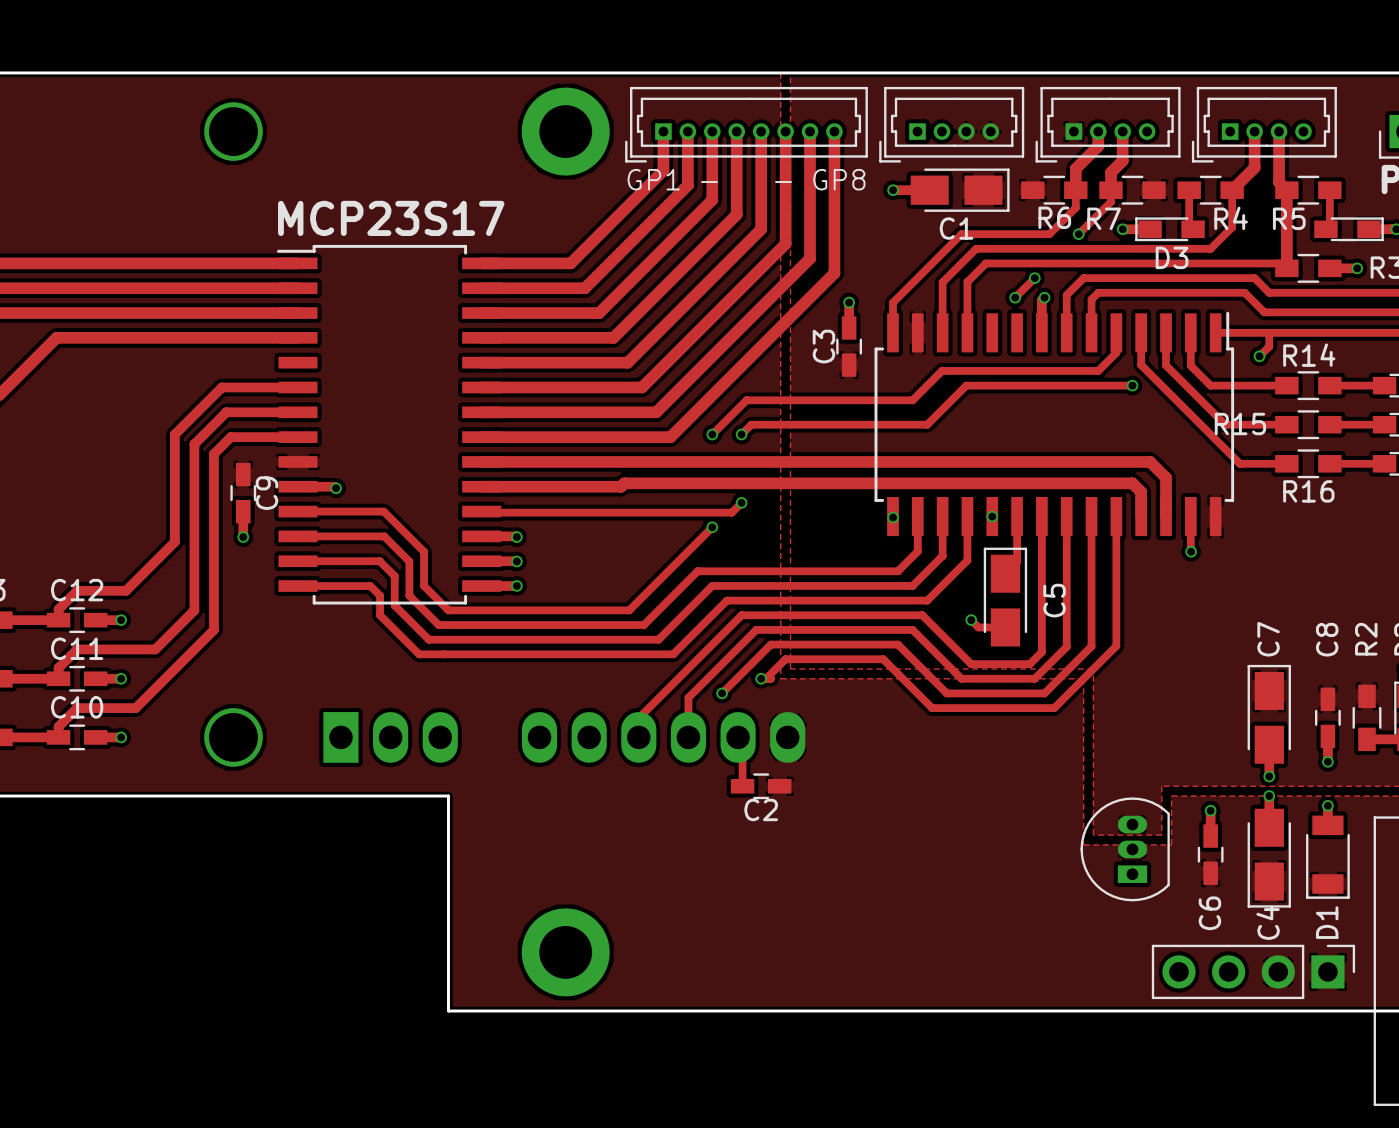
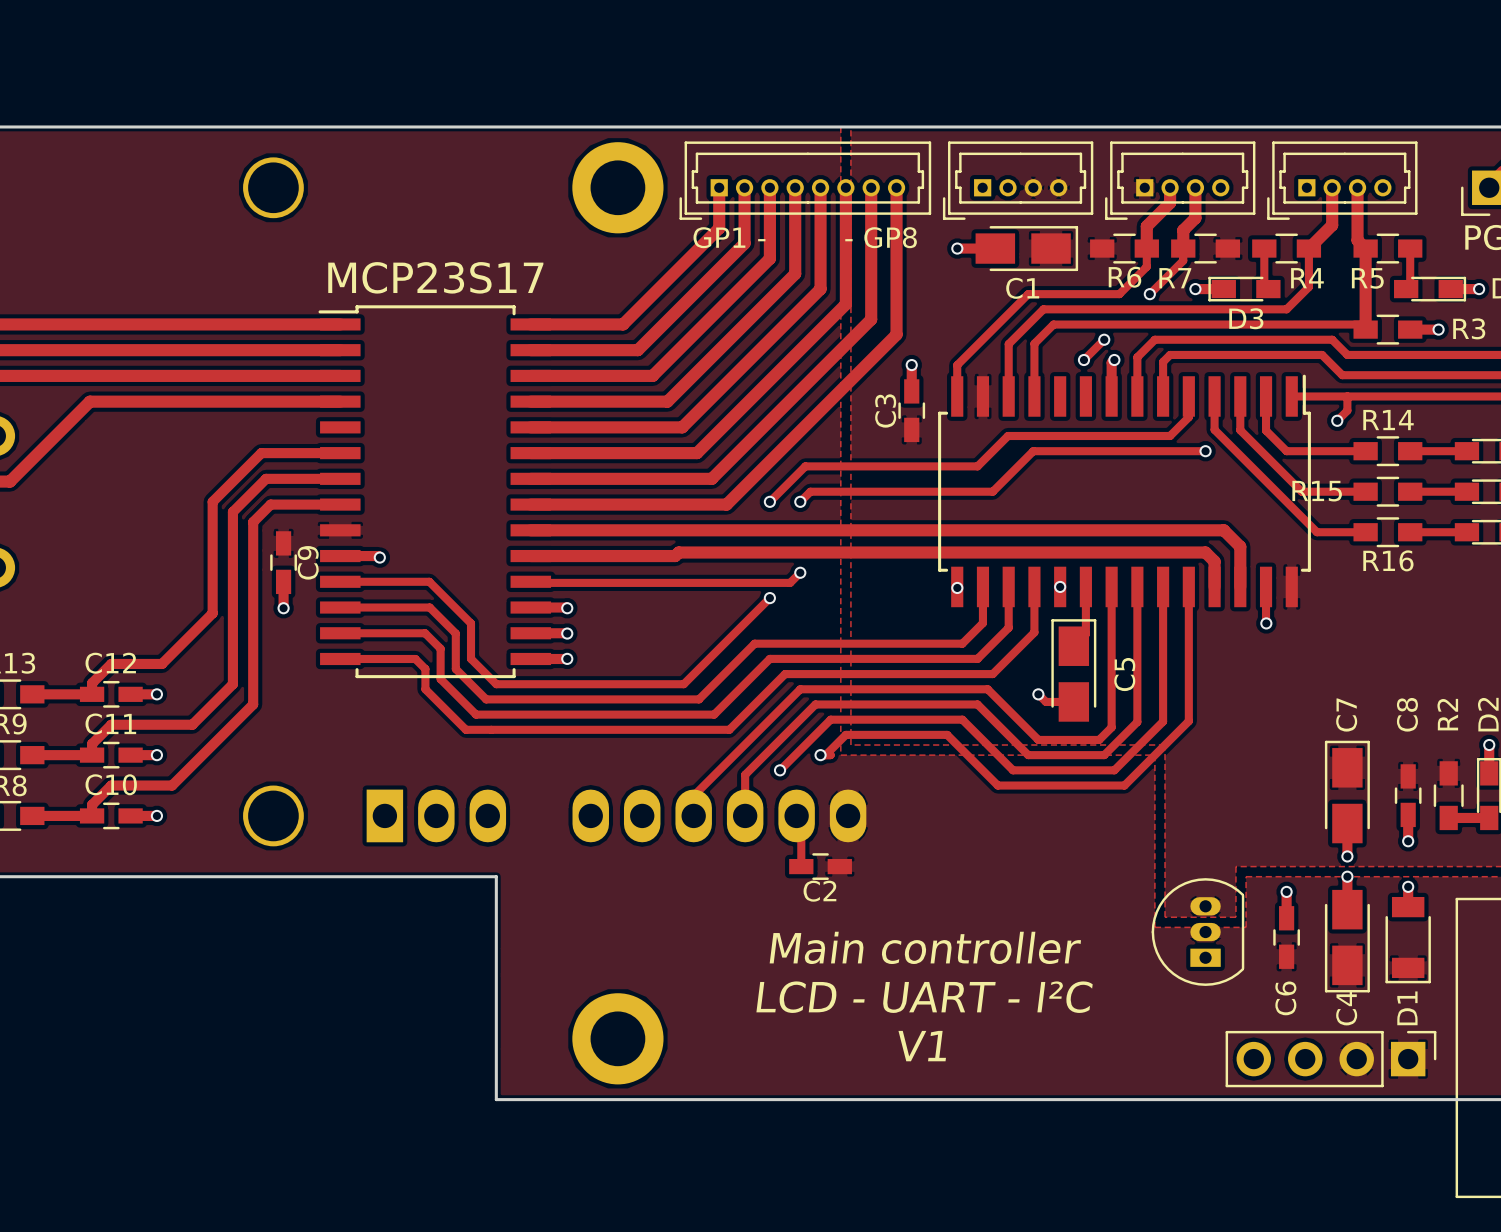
text: none -> Main controller (925, 947)
text: none -> LCD - UART - I²C (924, 997)
text: none -> V1 (922, 1046)

